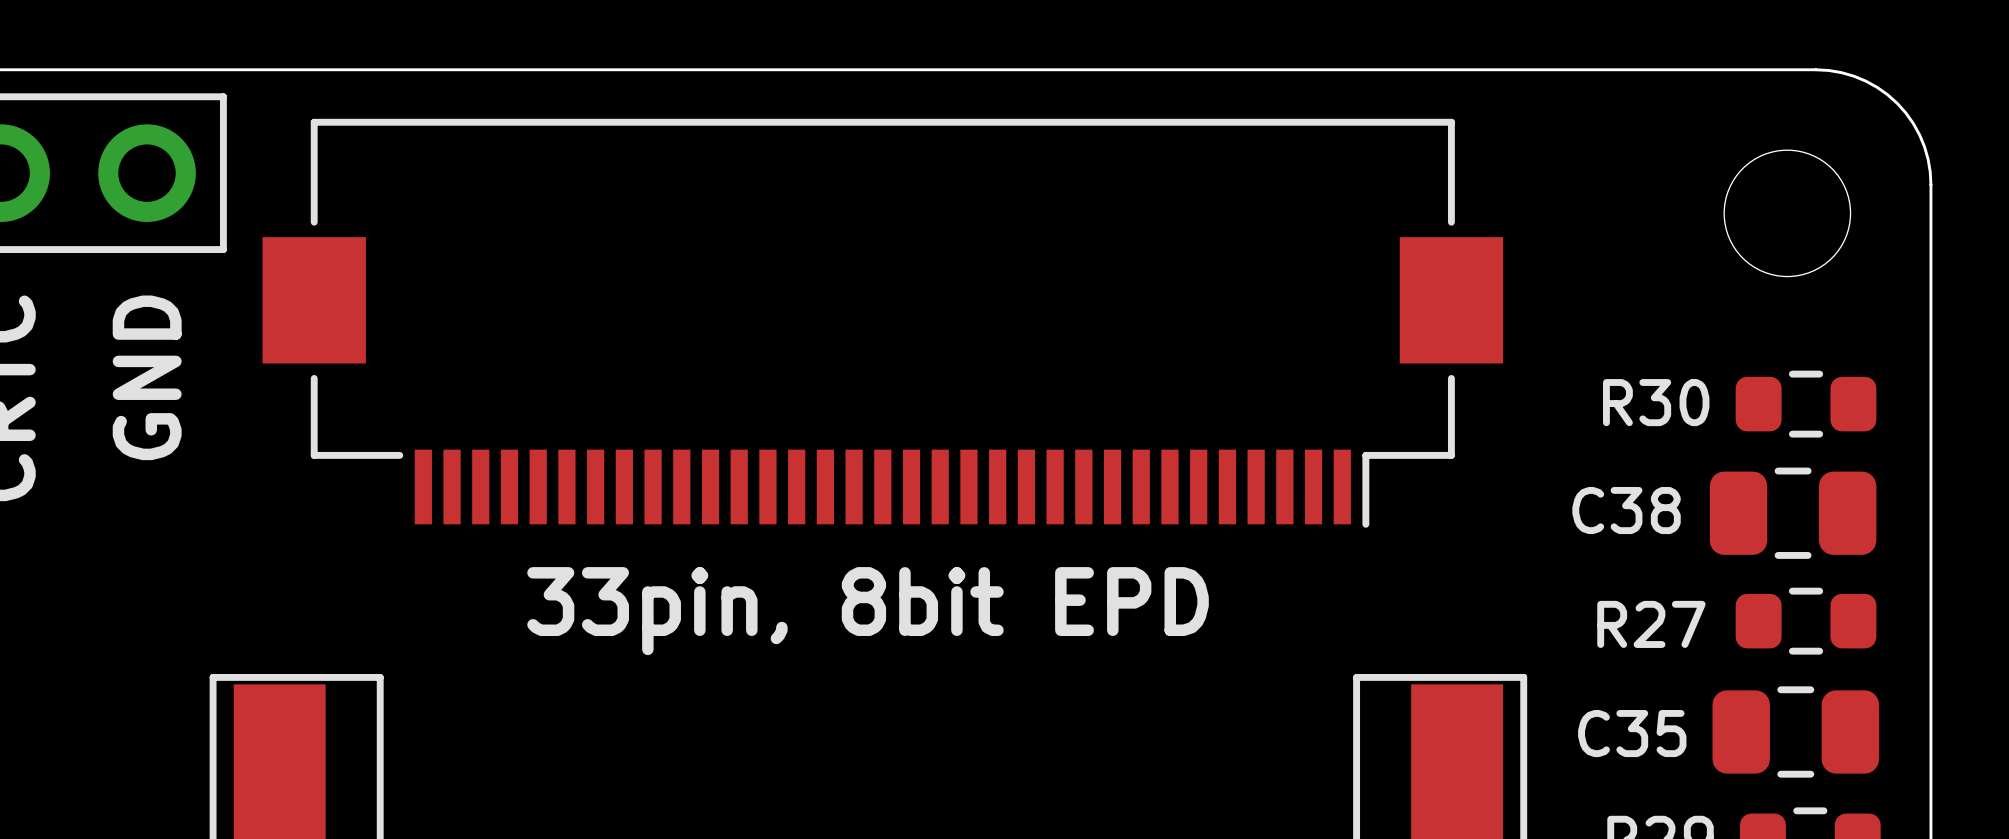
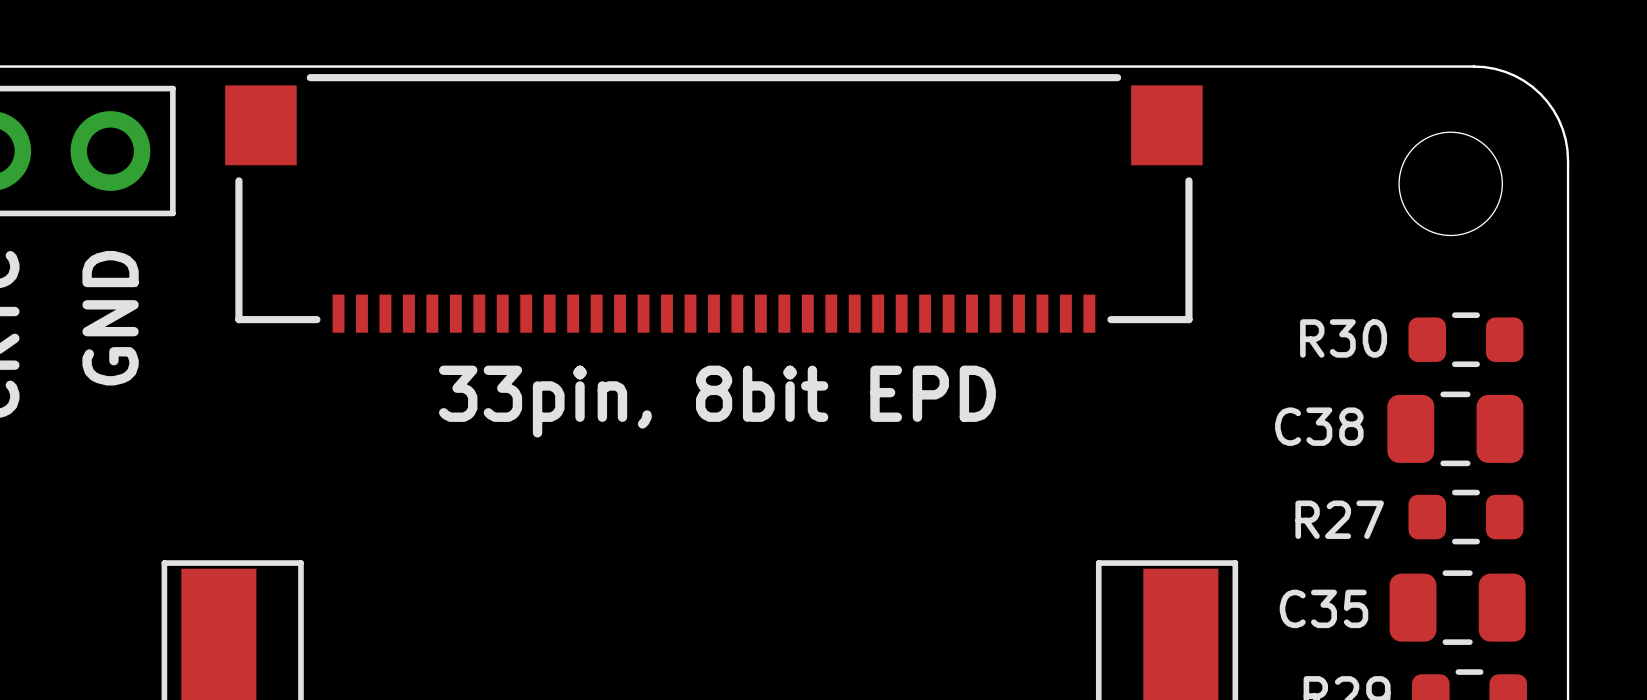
part: none -> (713, 203)
part: (882, 323) -> none
text position: 33pin, 8bit EPD (868, 611) -> 33pin, 8bit EPD (717, 401)

